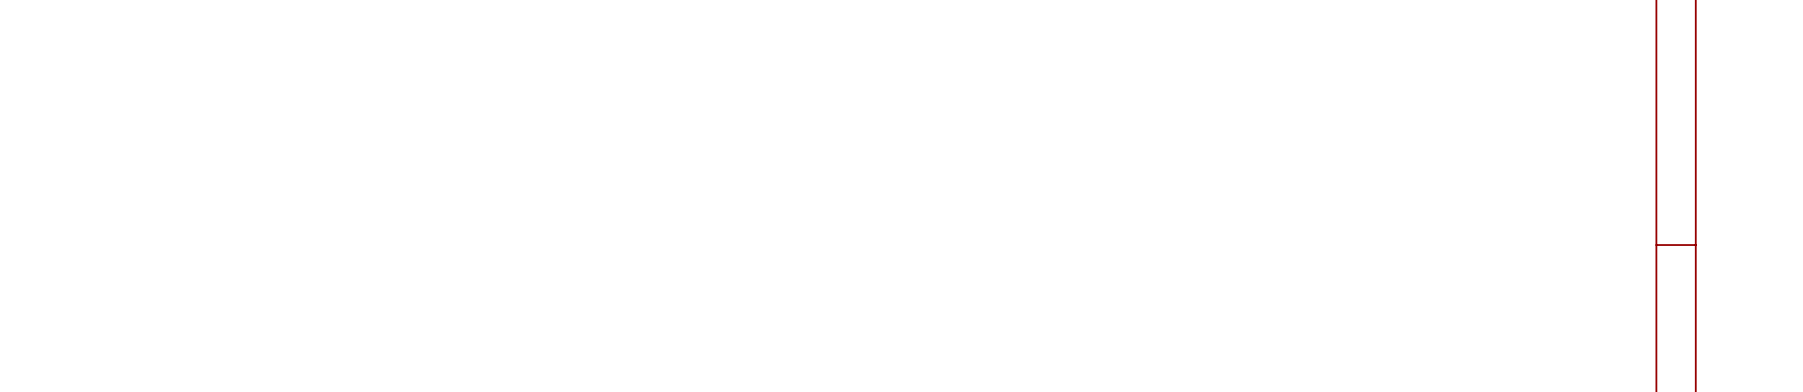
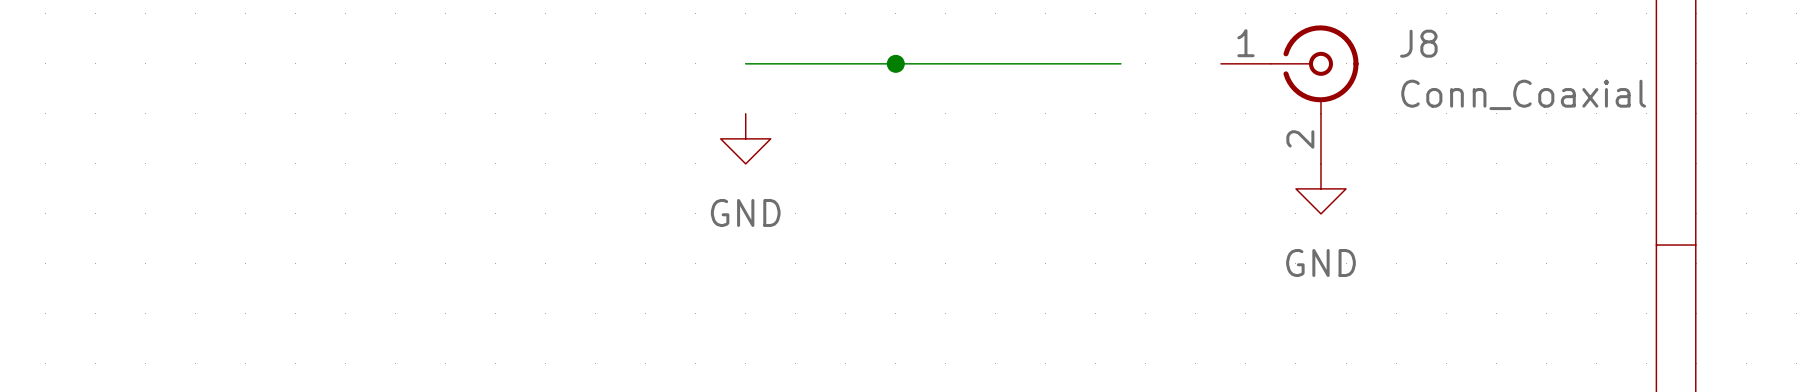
wire: none -> (745, 63) (1120, 63)
junction: none -> (895, 63)
J8: none -> Conn_Coaxial (1289, 94)
power symbol: none -> GND (745, 138)
power symbol: none -> GND (1320, 188)

